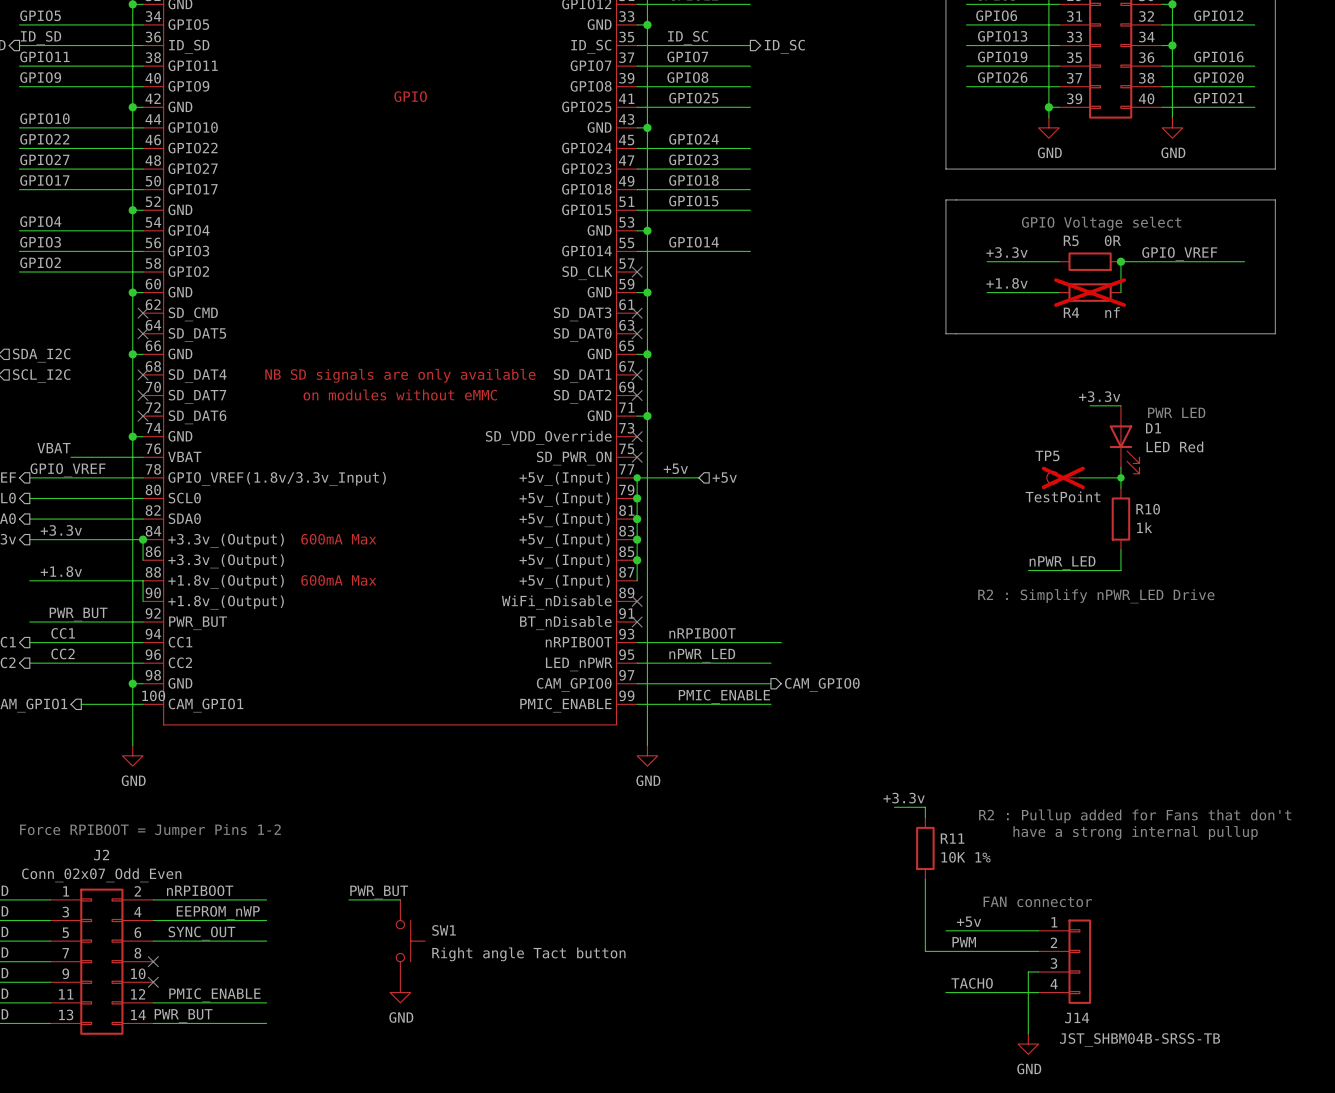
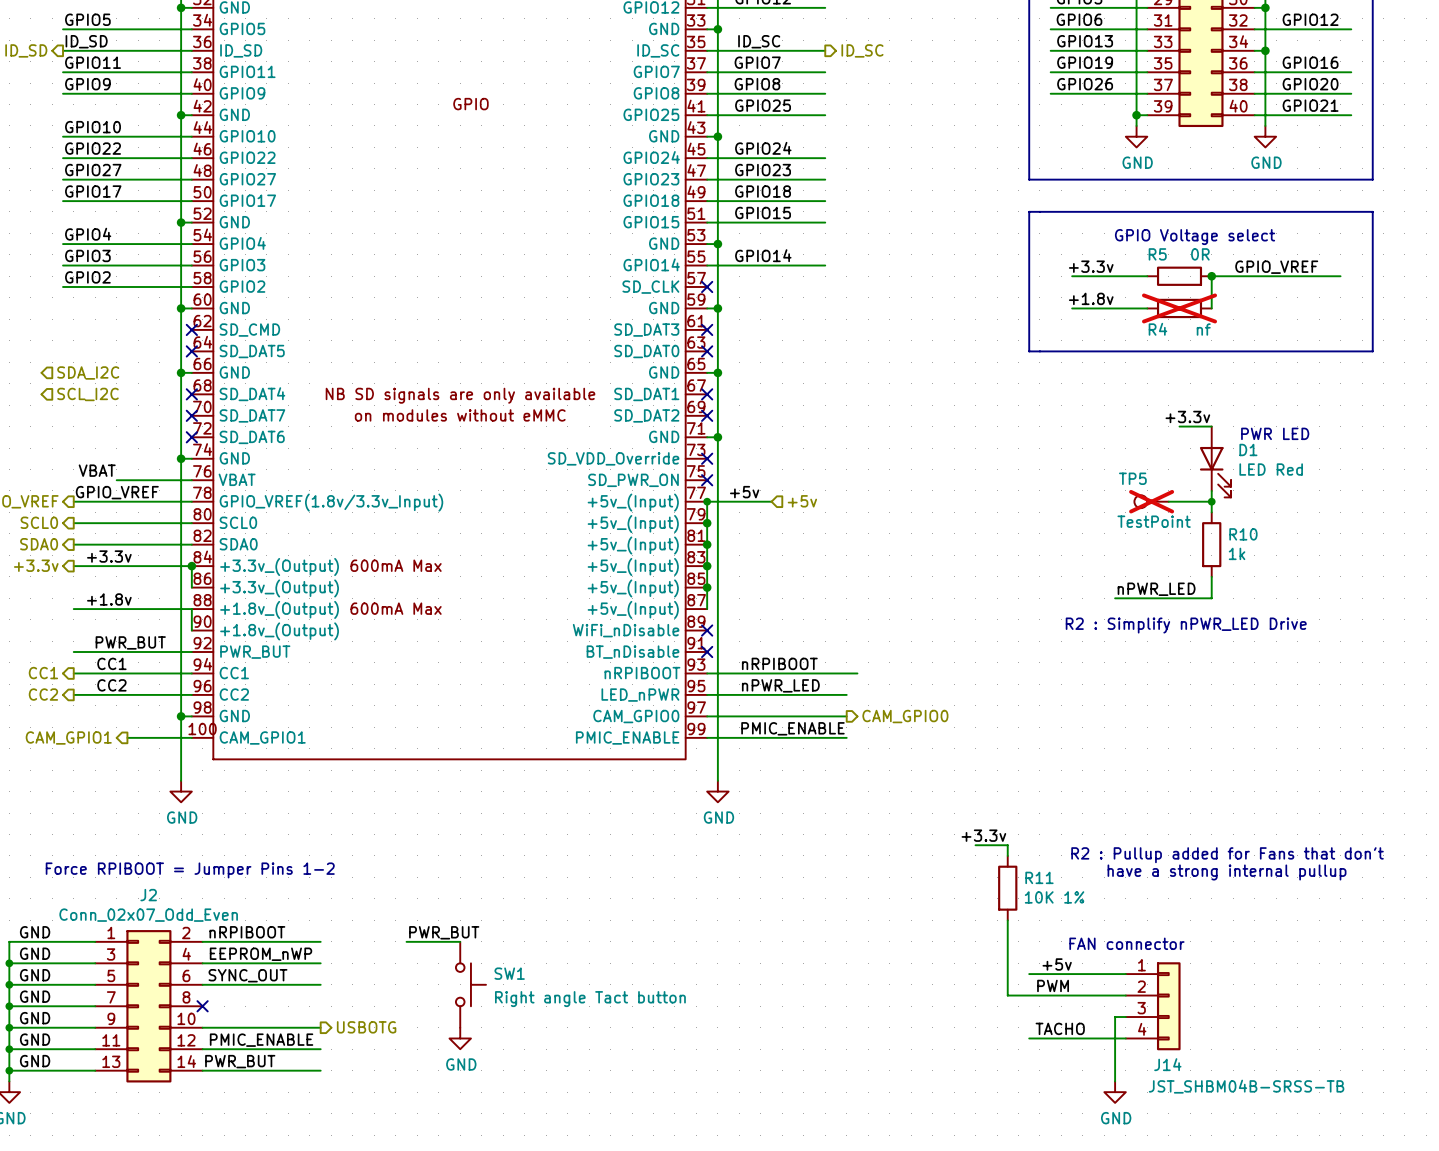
hierarchical label: none -> USBOTG (366, 1027)
wire: none -> (202, 1027) (320, 1027)
no-connect mark: (153, 982) -> none

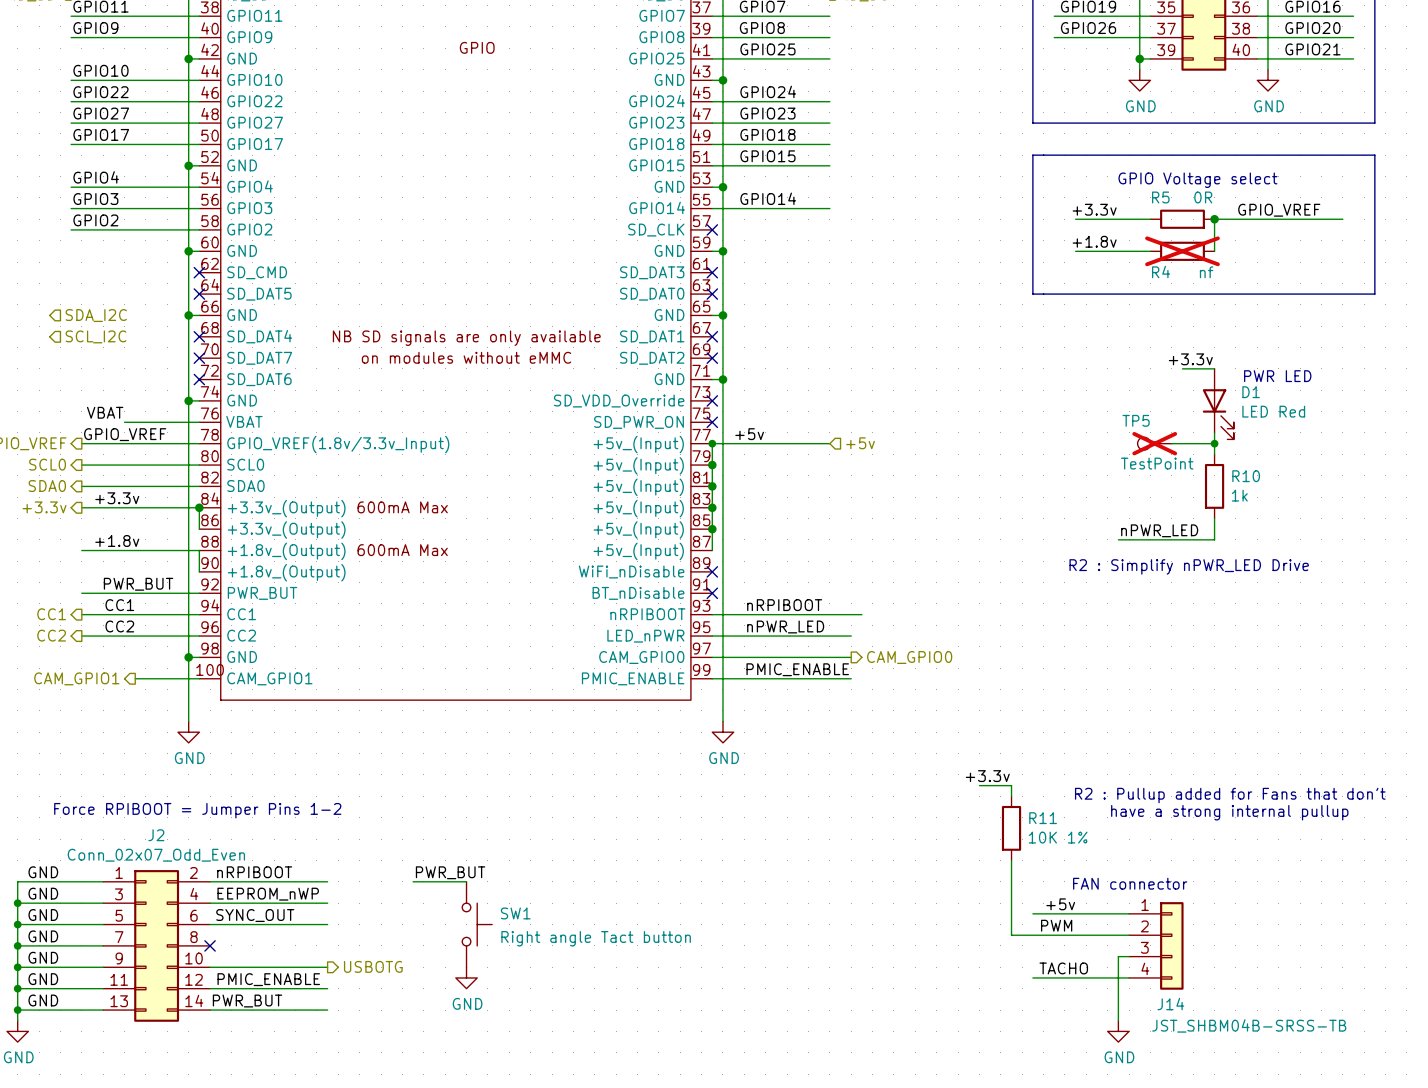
wire: none -> (776, 443) (829, 443)
hierarchical label position: +5v (802, 501) -> +5v (860, 443)

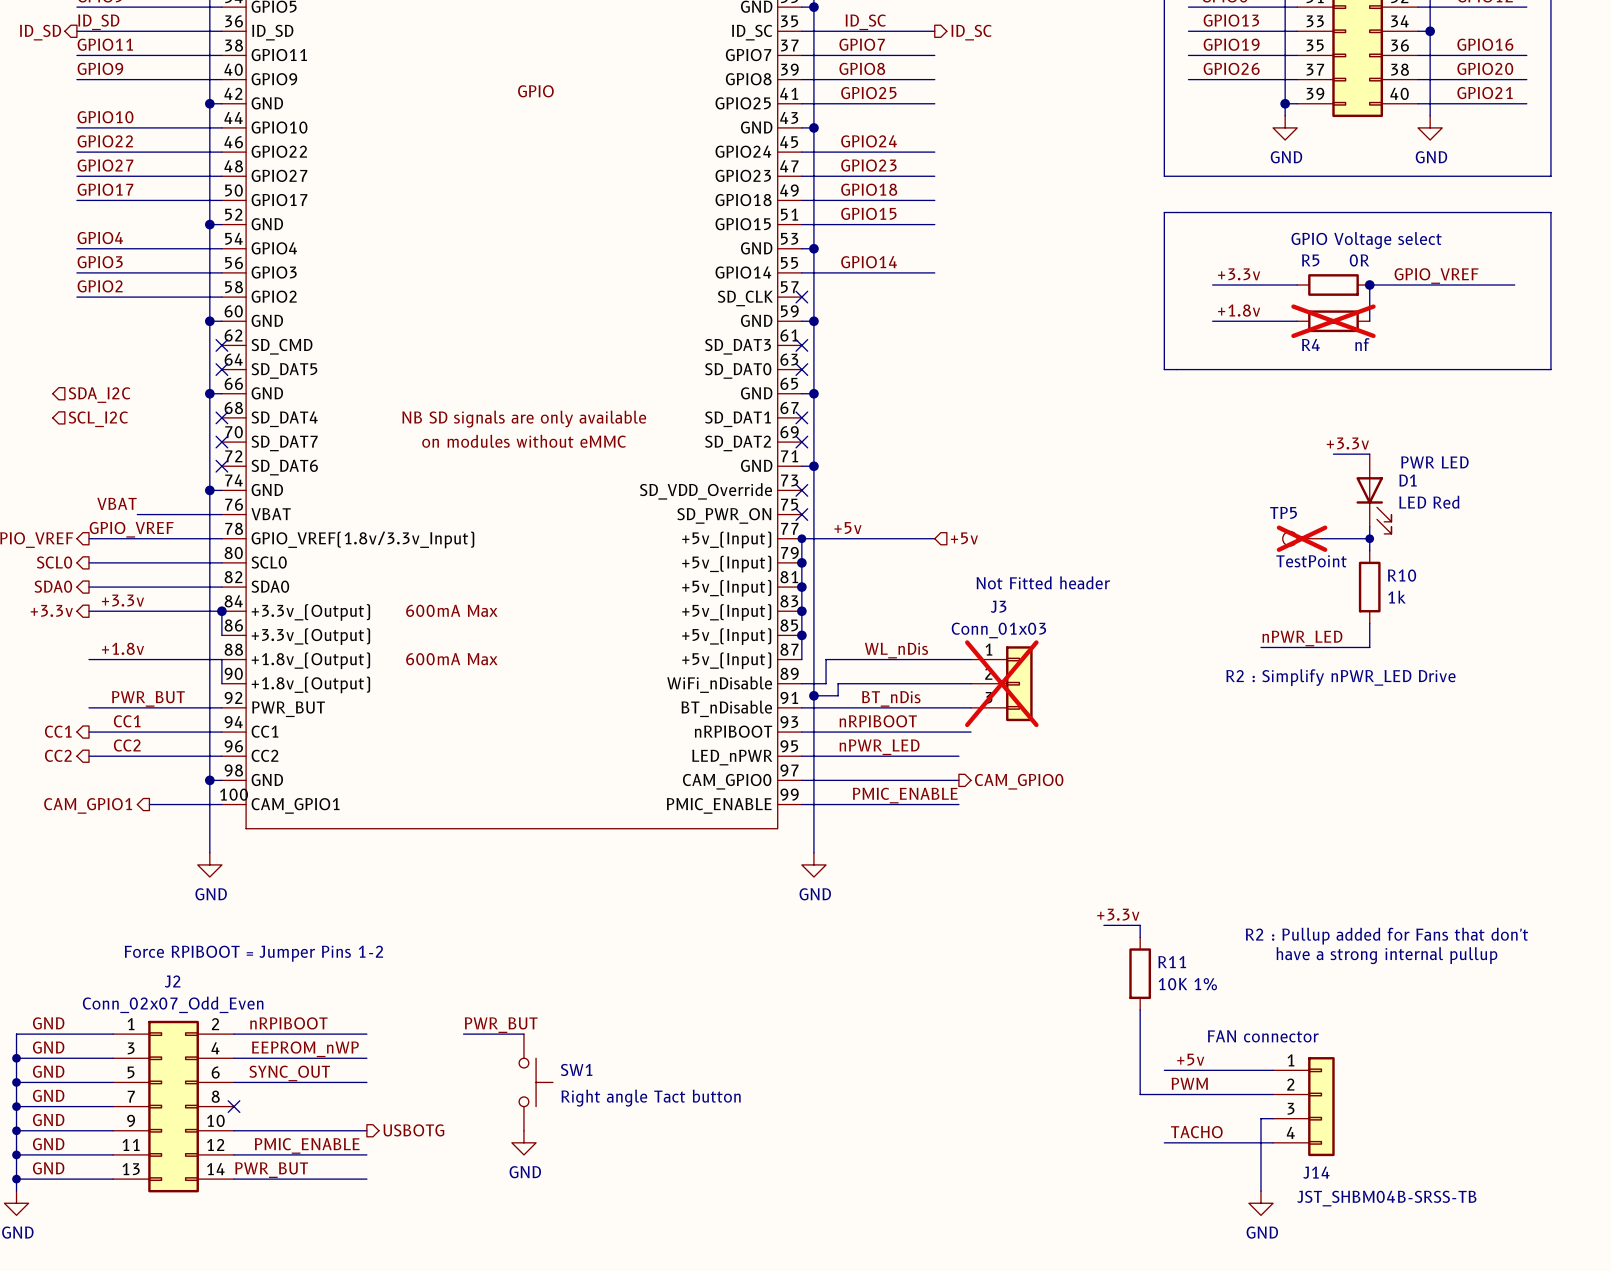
text: none -> Not Fitted header (1043, 582)
label: none -> WL_nDis (896, 650)
wire: none -> (971, 659) (826, 659) (826, 683) (801, 683)
no-connect mark: (712, 571) -> none
wire: none -> (971, 683) (838, 683) (838, 695) (813, 695)
J3: none -> Conn_01x03 (1001, 683)
junction: none -> (813, 695)
label: none -> BT_nDis (891, 698)
wire: none -> (801, 707) (971, 707)
no-connect mark: (712, 593) -> none

